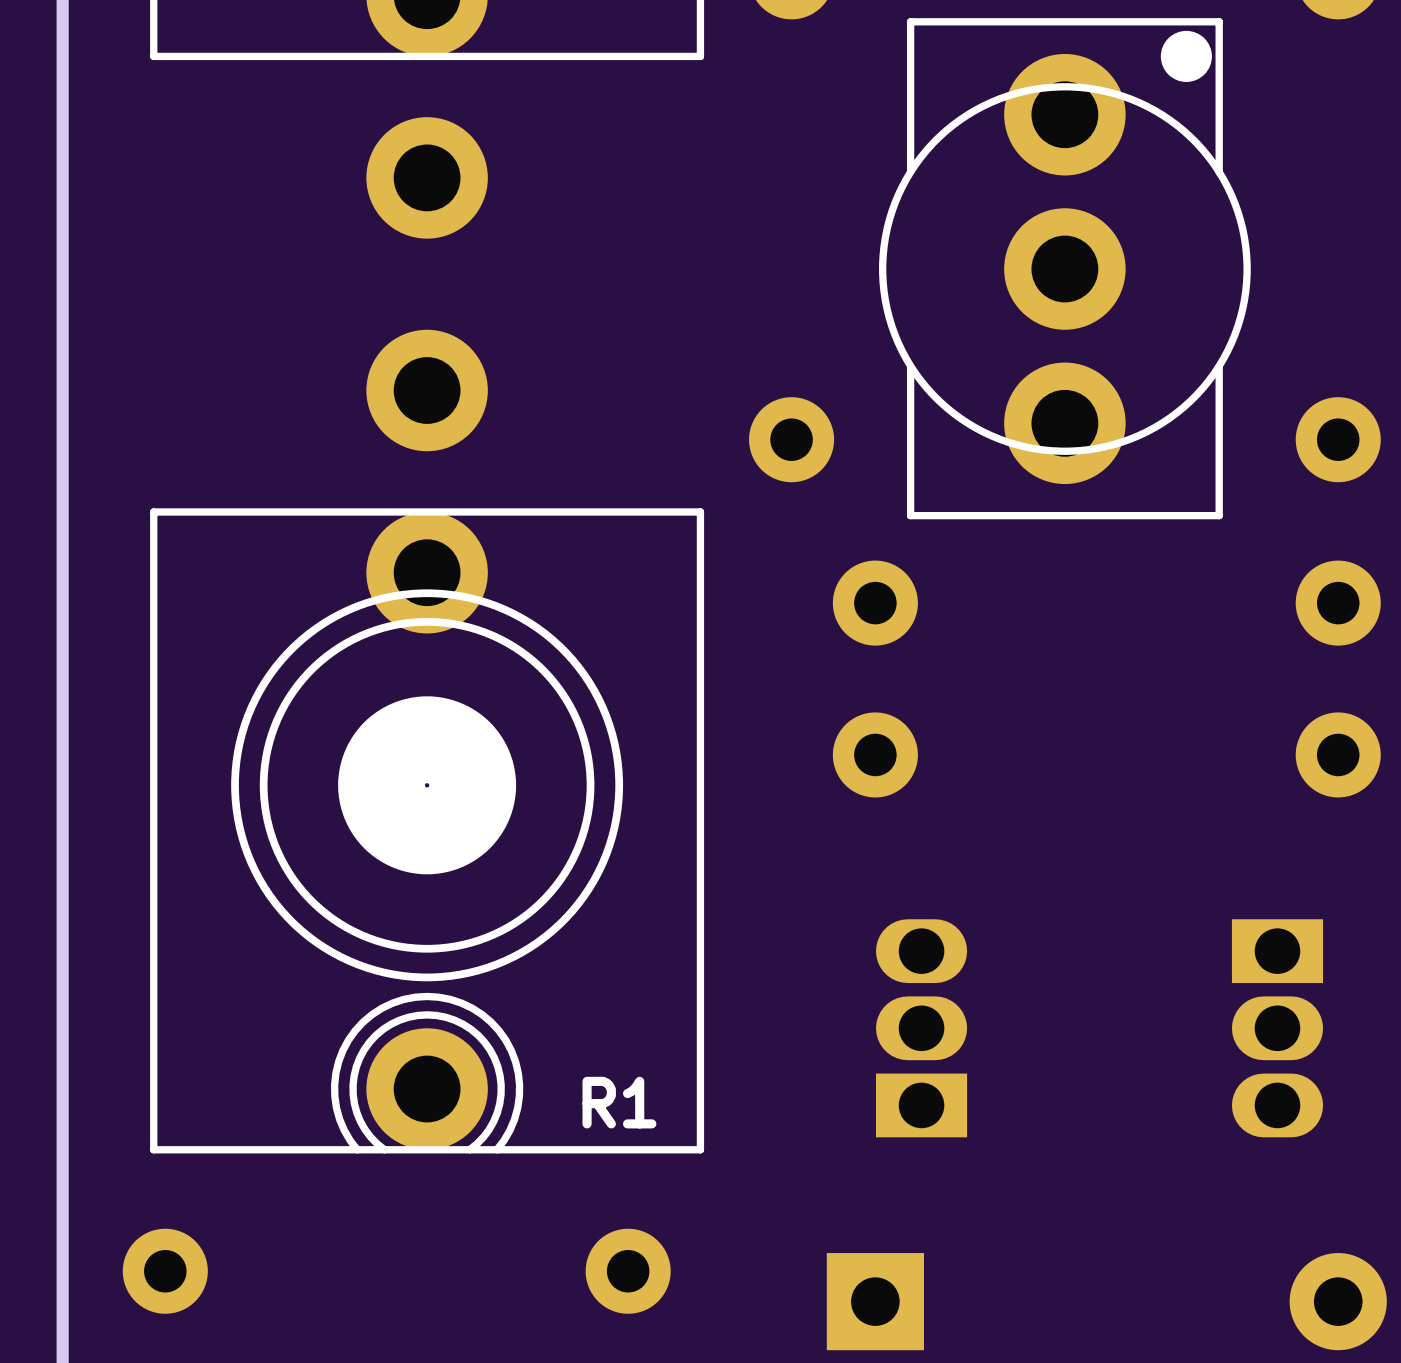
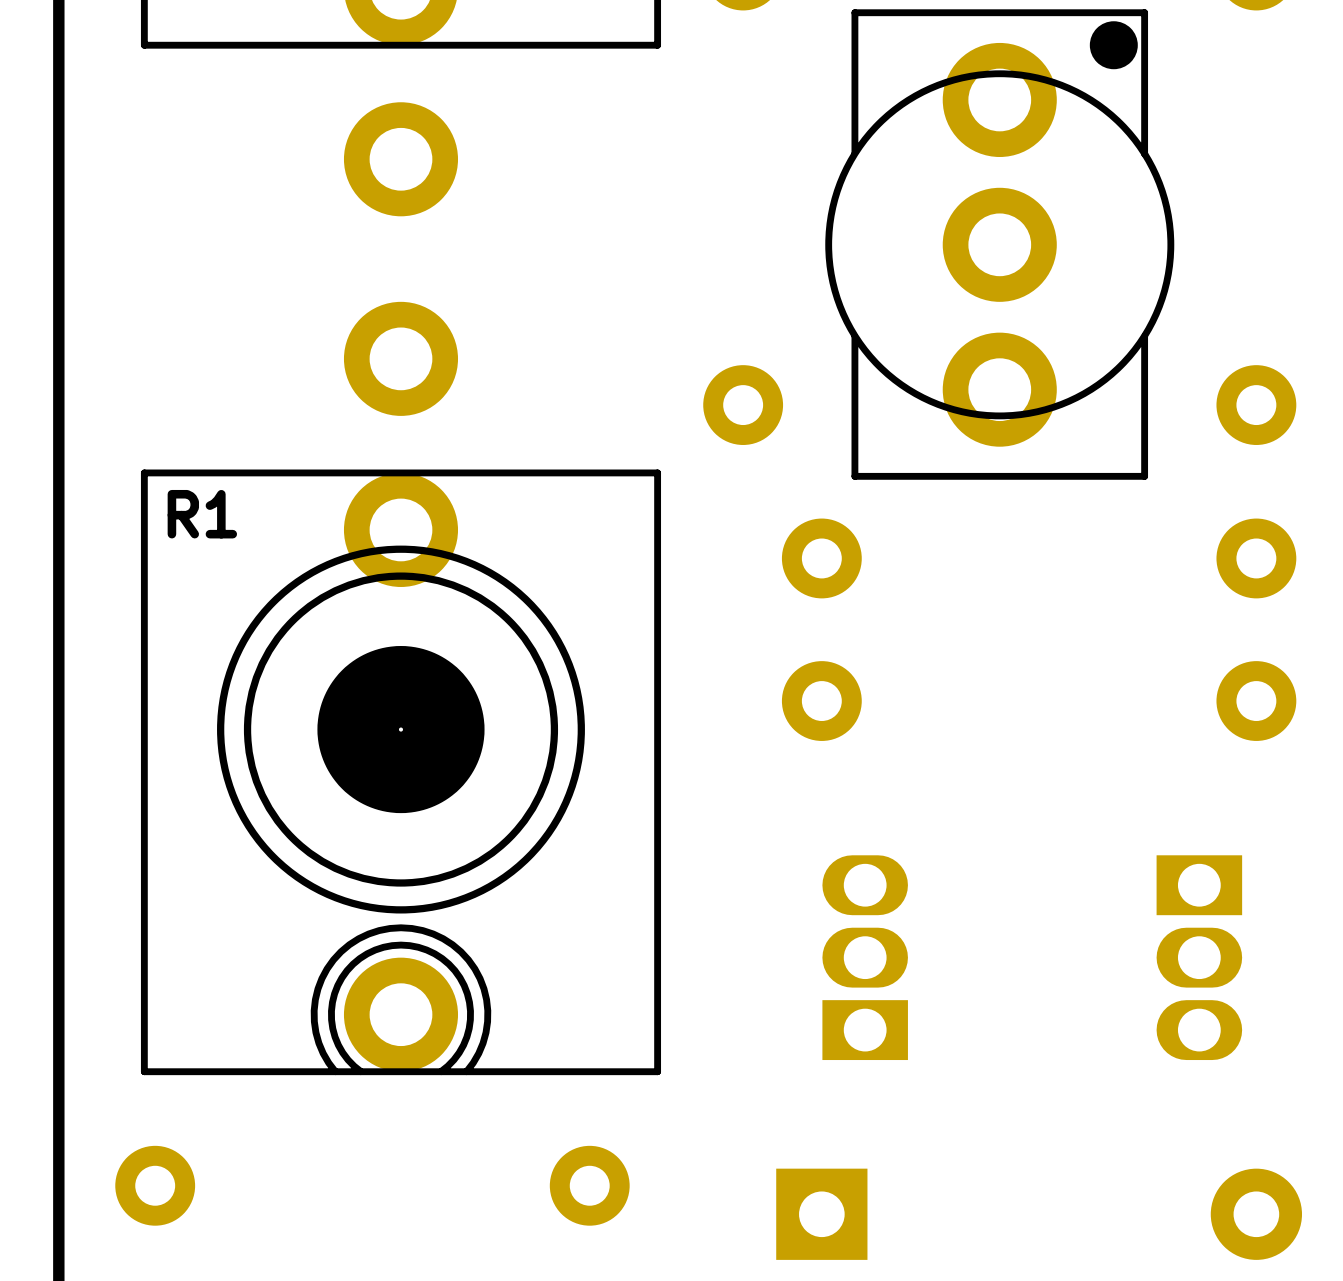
part value position: R1 (619, 1102) -> R1 (202, 514)

